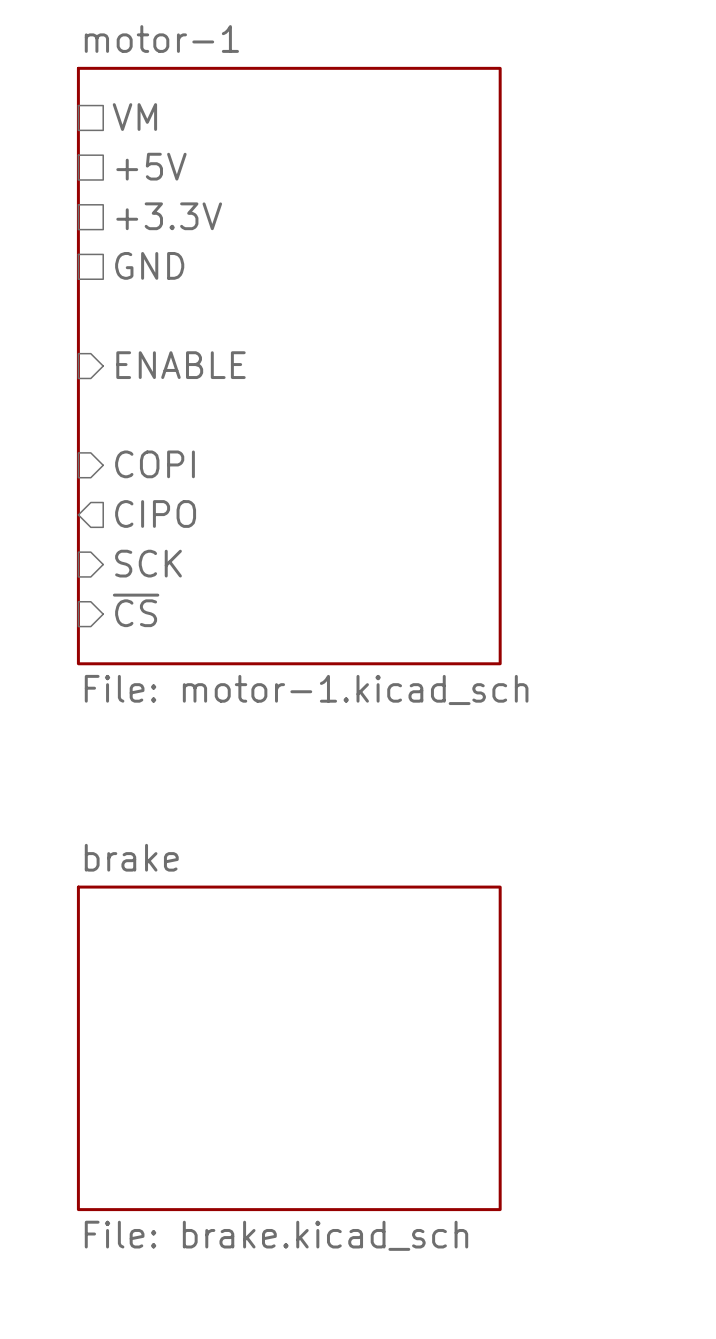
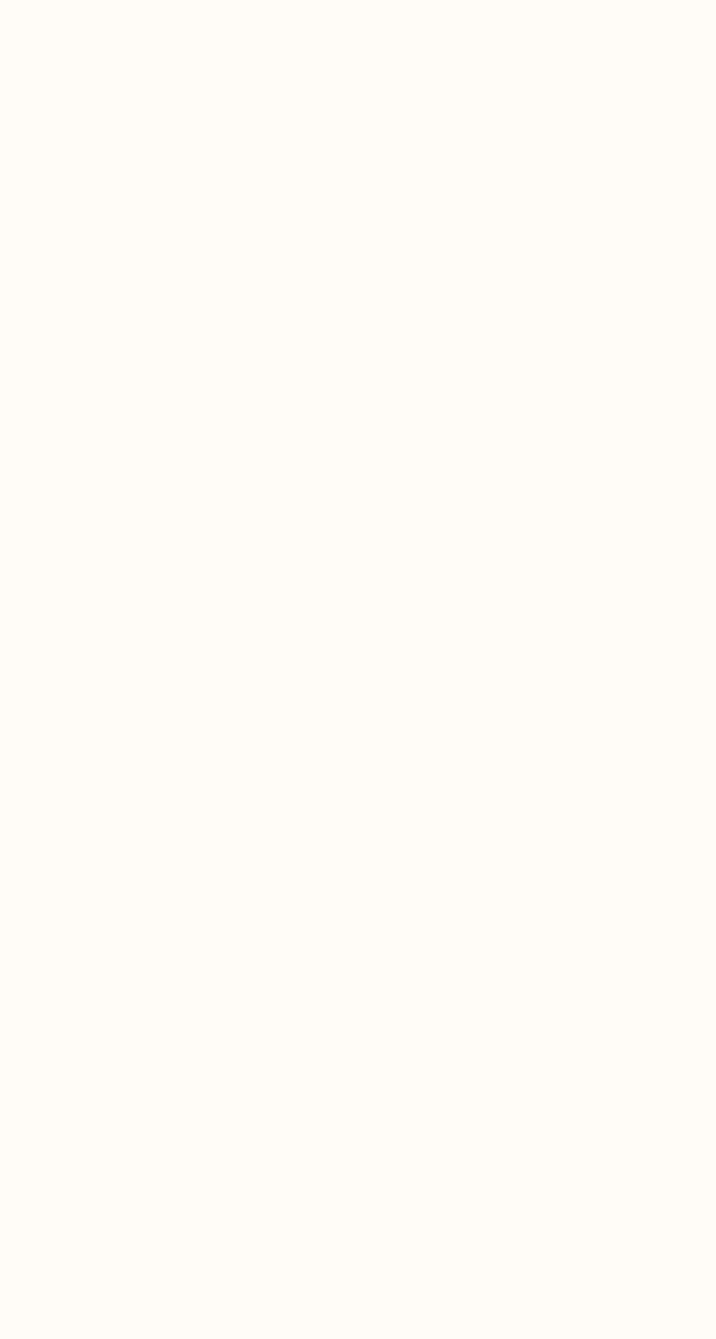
sheet pin: VM (134, 117) -> none
sheet pin: +5V (151, 166) -> none
sheet pin: +3.3V (169, 216) -> none
sheet pin: GND (149, 265) -> none
sheet pin: ENABLE (180, 365) -> none
sheet motor-1: File: motor-1.kicad_sch (289, 366) -> none
sheet pin: COPI (155, 464) -> none
sheet pin: CIPO (155, 513) -> none
sheet pin: SCK (148, 563) -> none
sheet pin: ~{CS} (136, 610) -> none
sheet brake: File: brake.kicad_sch (289, 1048) -> none

